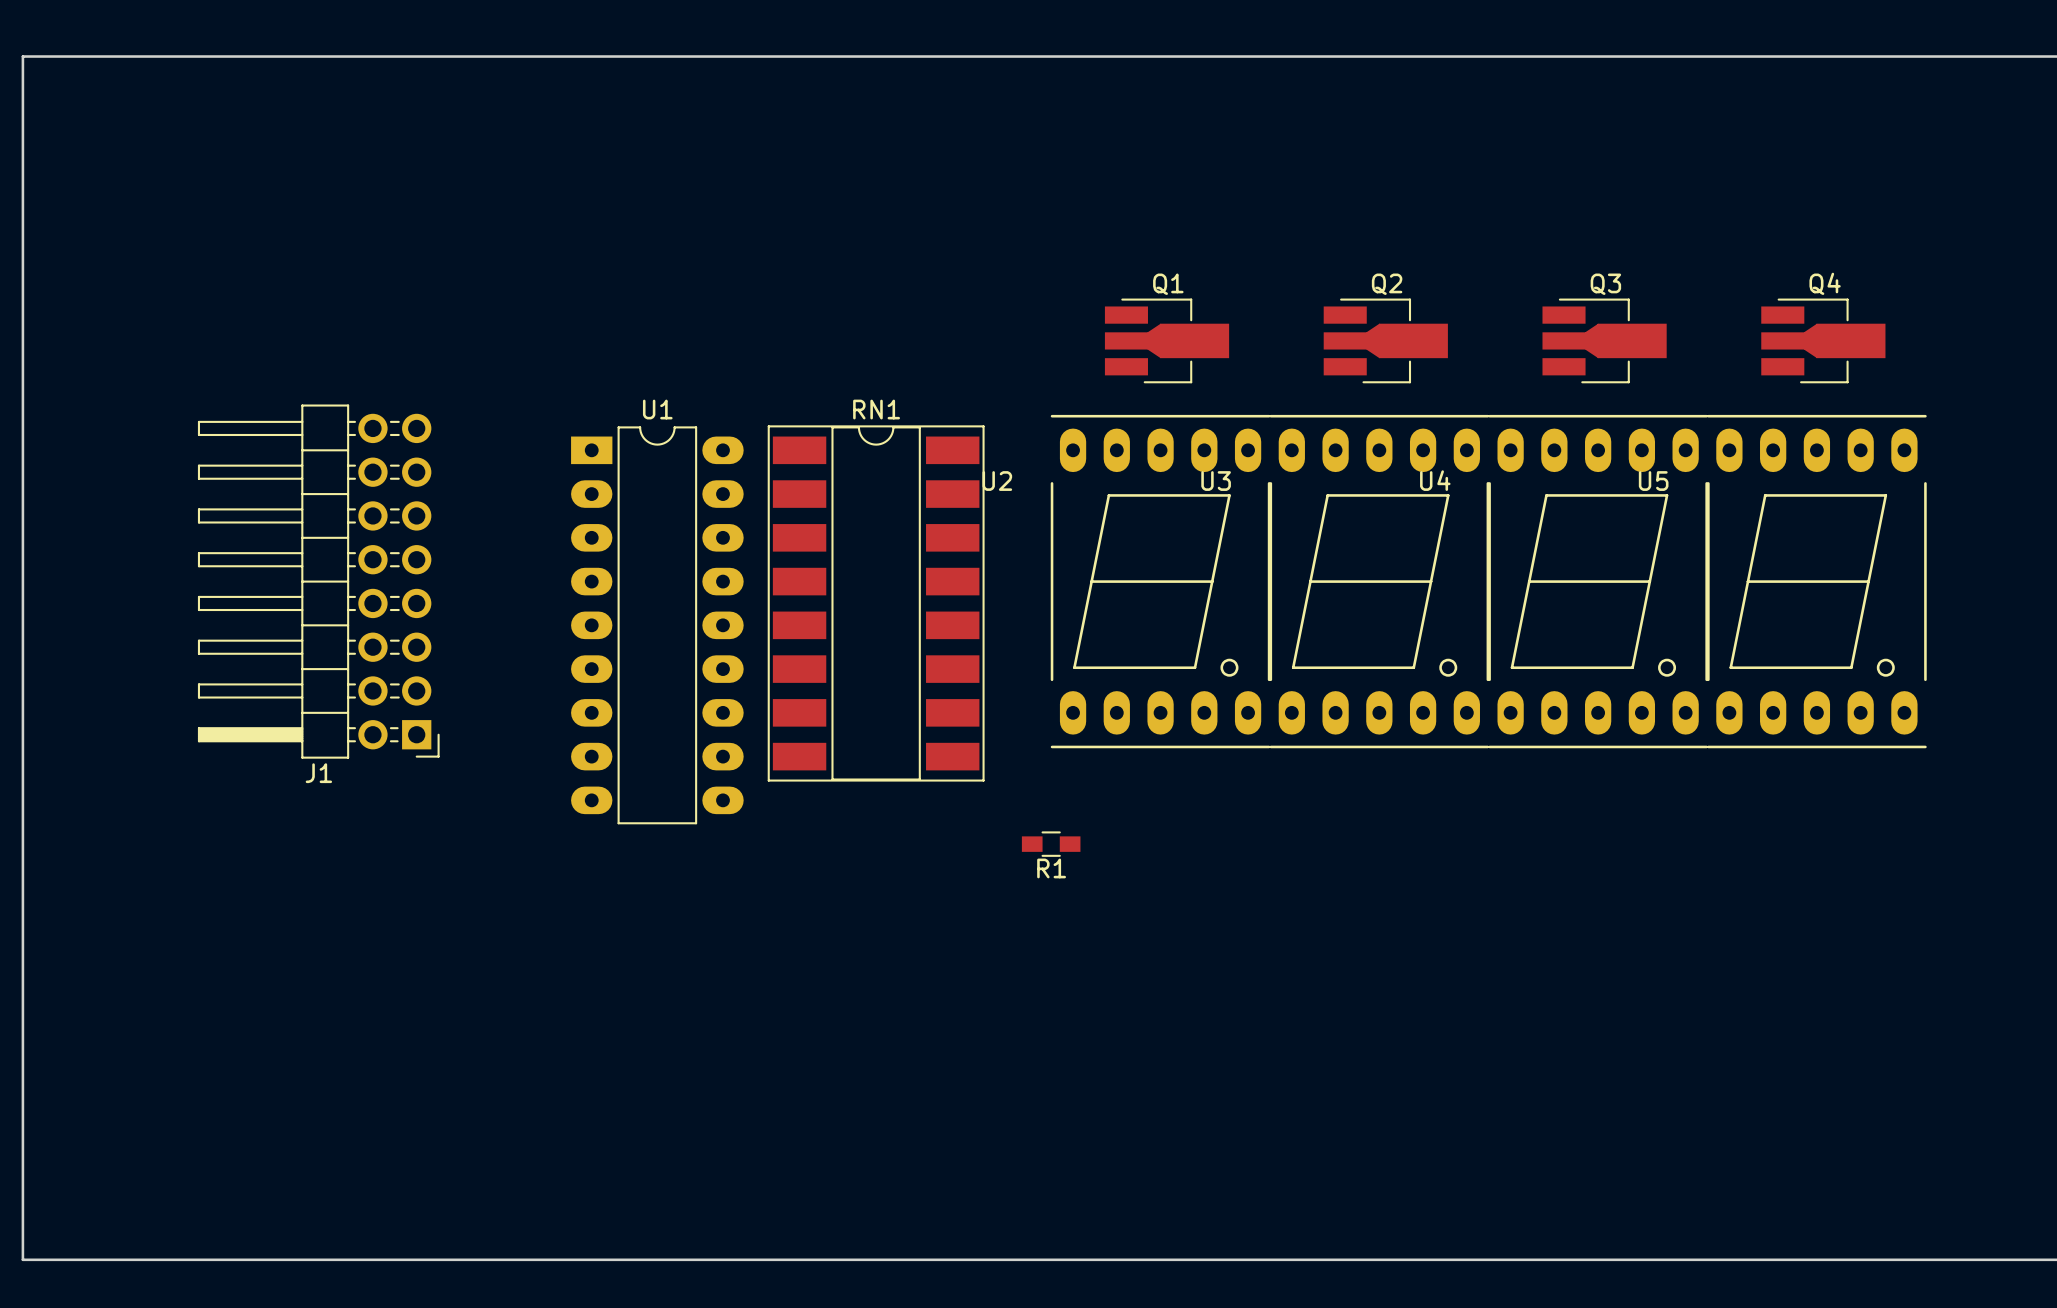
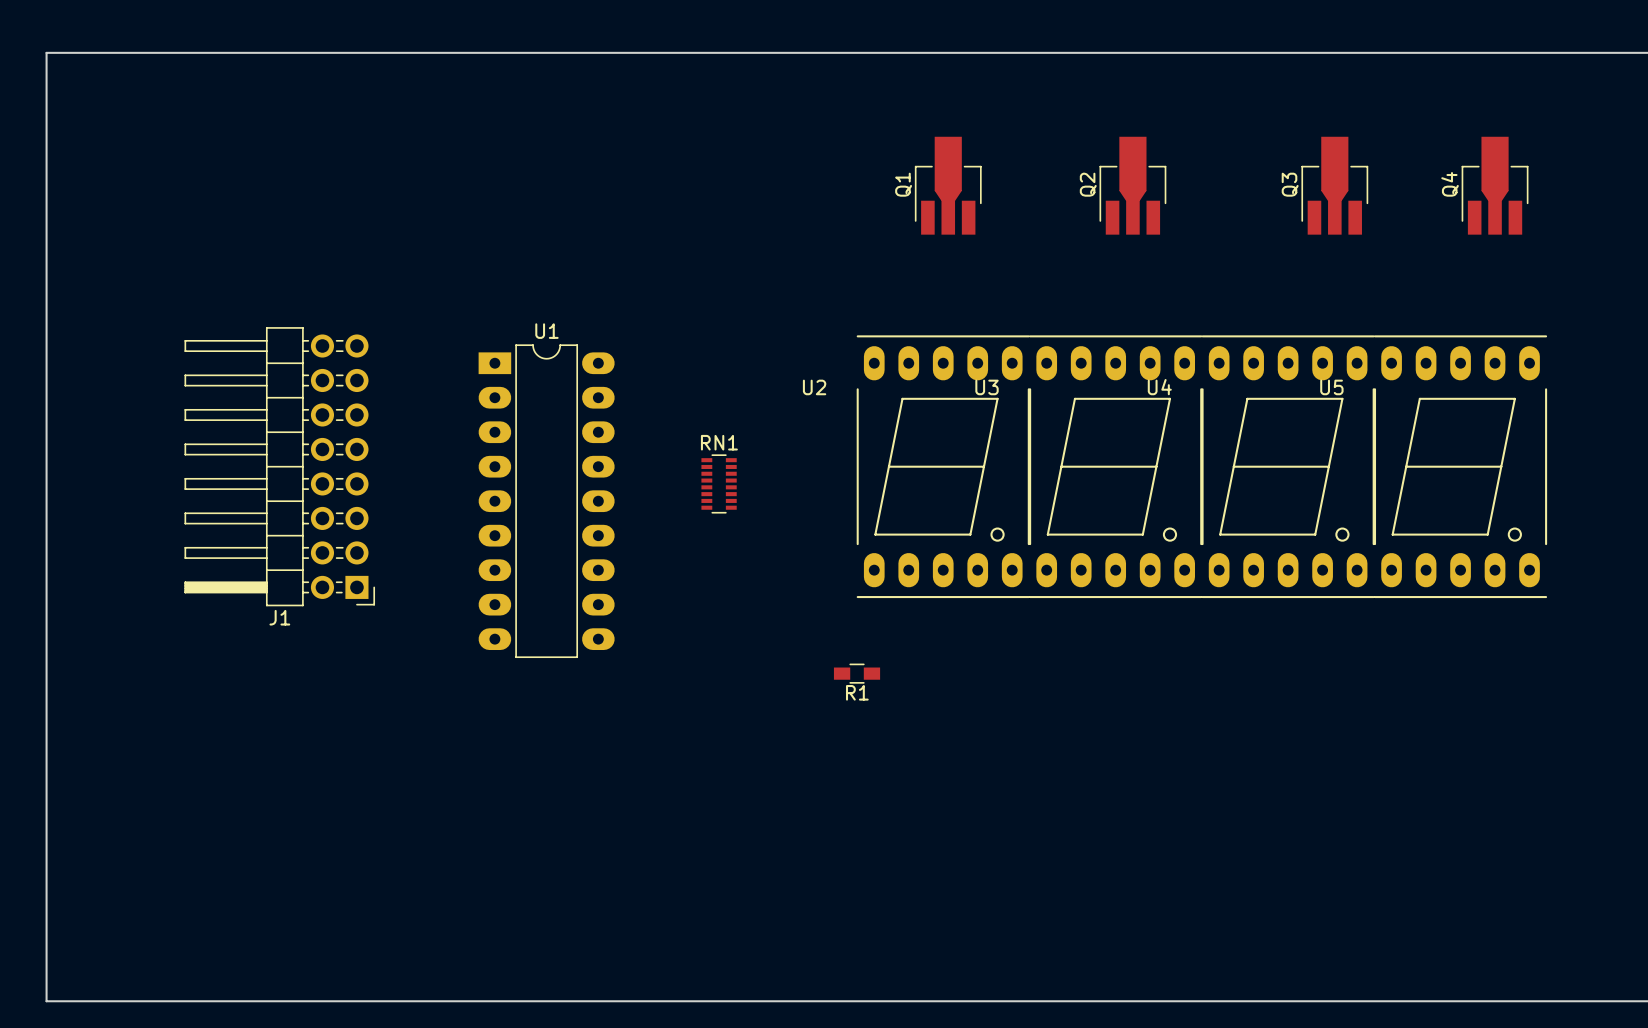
Q1 rotation: 0° (1167, 340) -> 90° counterclockwise (948, 185)
Q1 position: (1167, 340) -> (948, 185)
Q2 rotation: 0° (1385, 340) -> 90° counterclockwise (1132, 185)
Q2 position: (1385, 340) -> (1132, 185)
Q3 rotation: 0° (1604, 340) -> 90° counterclockwise (1334, 185)
Q3 position: (1604, 340) -> (1334, 185)
Q4 rotation: 0° (1823, 340) -> 90° counterclockwise (1495, 185)
Q4 position: (1823, 340) -> (1495, 185)
RN1 name position: RN1 (876, 409) -> RN1 (719, 442)
RN1 footprint: [767, 425, 985, 782] -> [701, 454, 737, 514]

